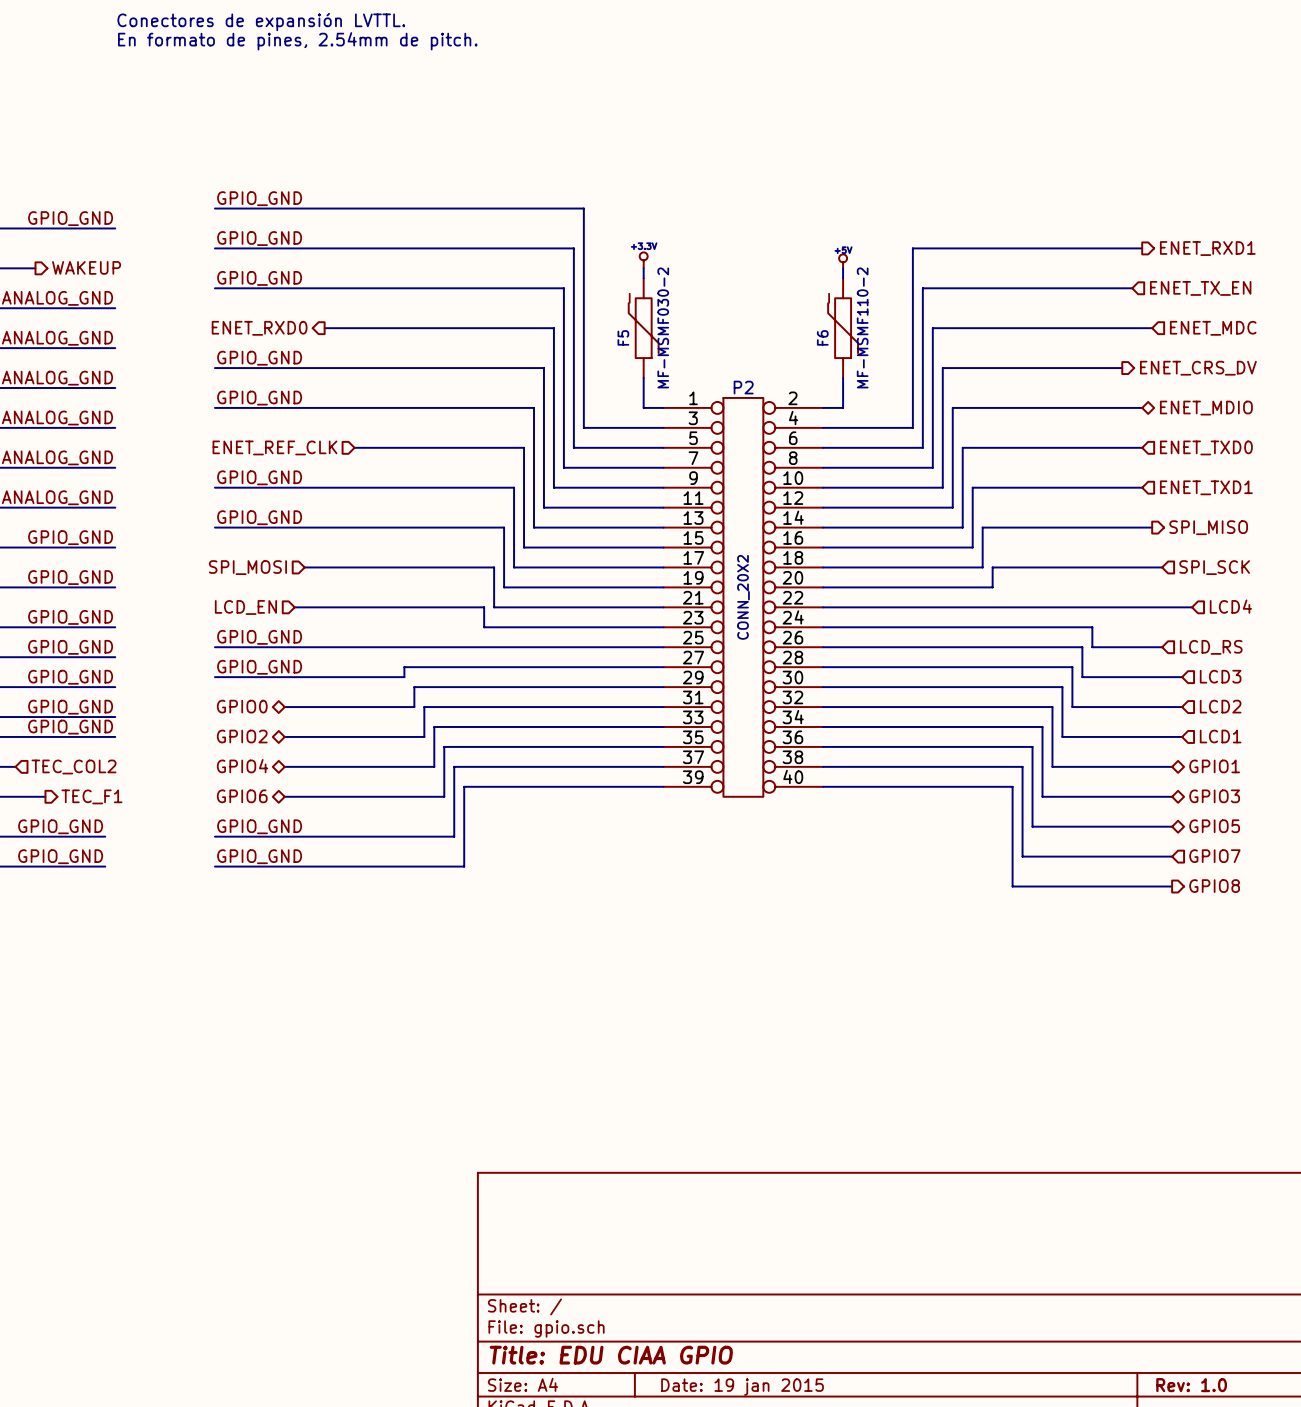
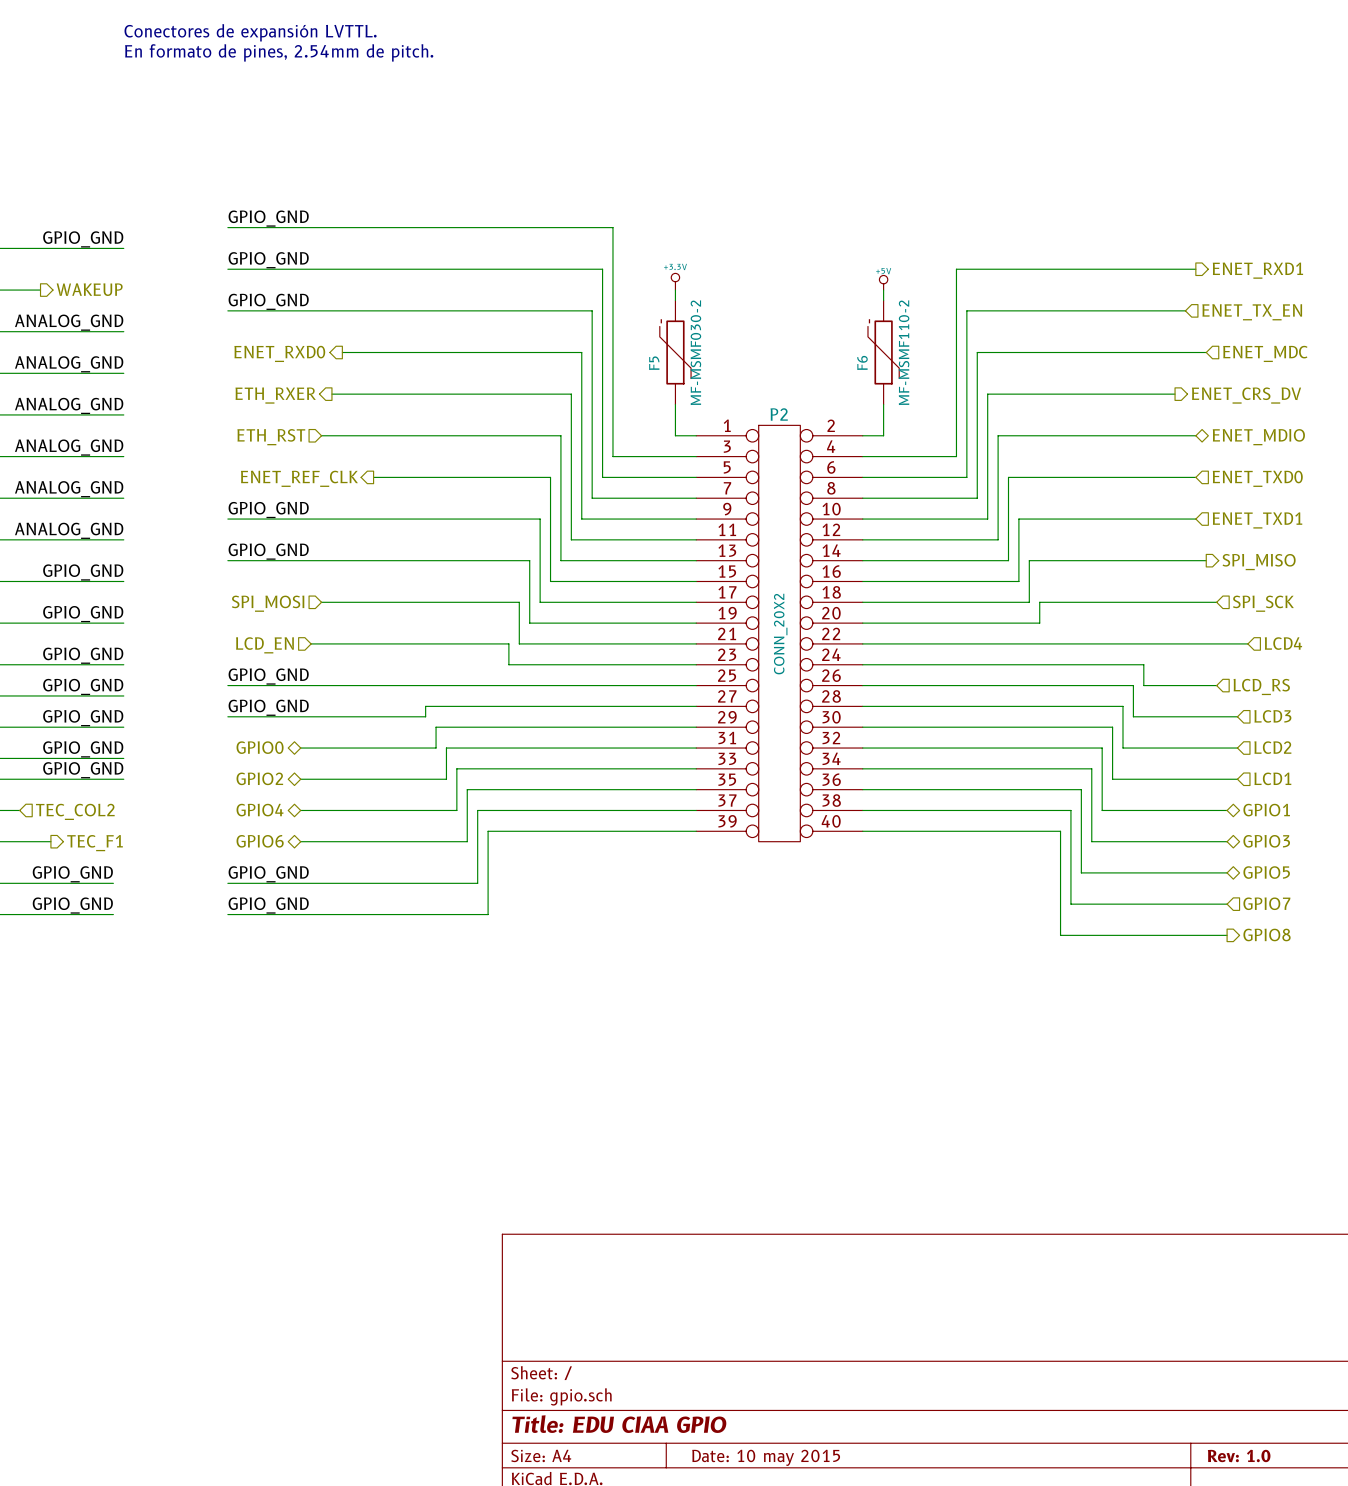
label: GPIO_GND (259, 358) -> none
wire: (214, 368) (314, 368) -> none
hierarchical label: none -> ETH_RXER (275, 395)
label: GPIO_GND (259, 398) -> none
wire: (214, 407) (304, 407) -> none
hierarchical label: none -> ETH_RST (271, 437)
hierarchical label shape: input (274, 447) -> output (299, 478)
title block: Date: 19 jan 2015 (742, 1387) -> Date: 10 may 2015 (766, 1457)

